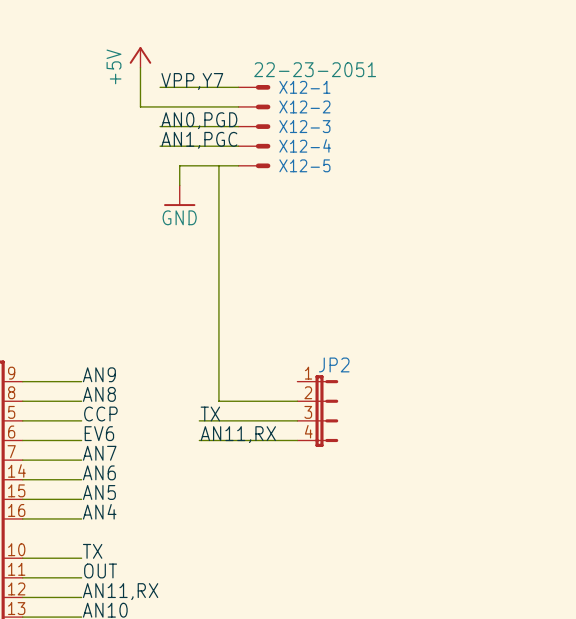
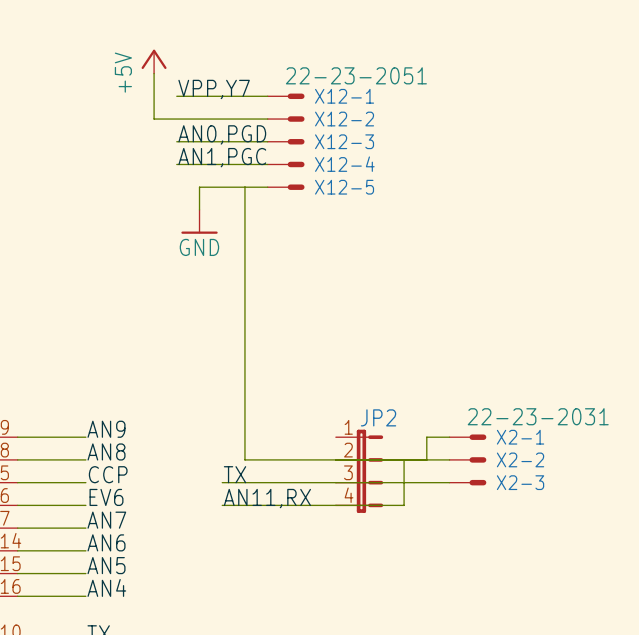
wire: none -> (449, 437) (426, 437) (426, 459)
X2-1: none -> 22-23-2031 (467, 437)
wire: none -> (335, 459) (449, 459)
wire: none -> (404, 459) (404, 505) (335, 505)
X2-2: none -> (467, 459)
wire: none -> (335, 482) (449, 482)
X2-3: none -> (467, 482)

